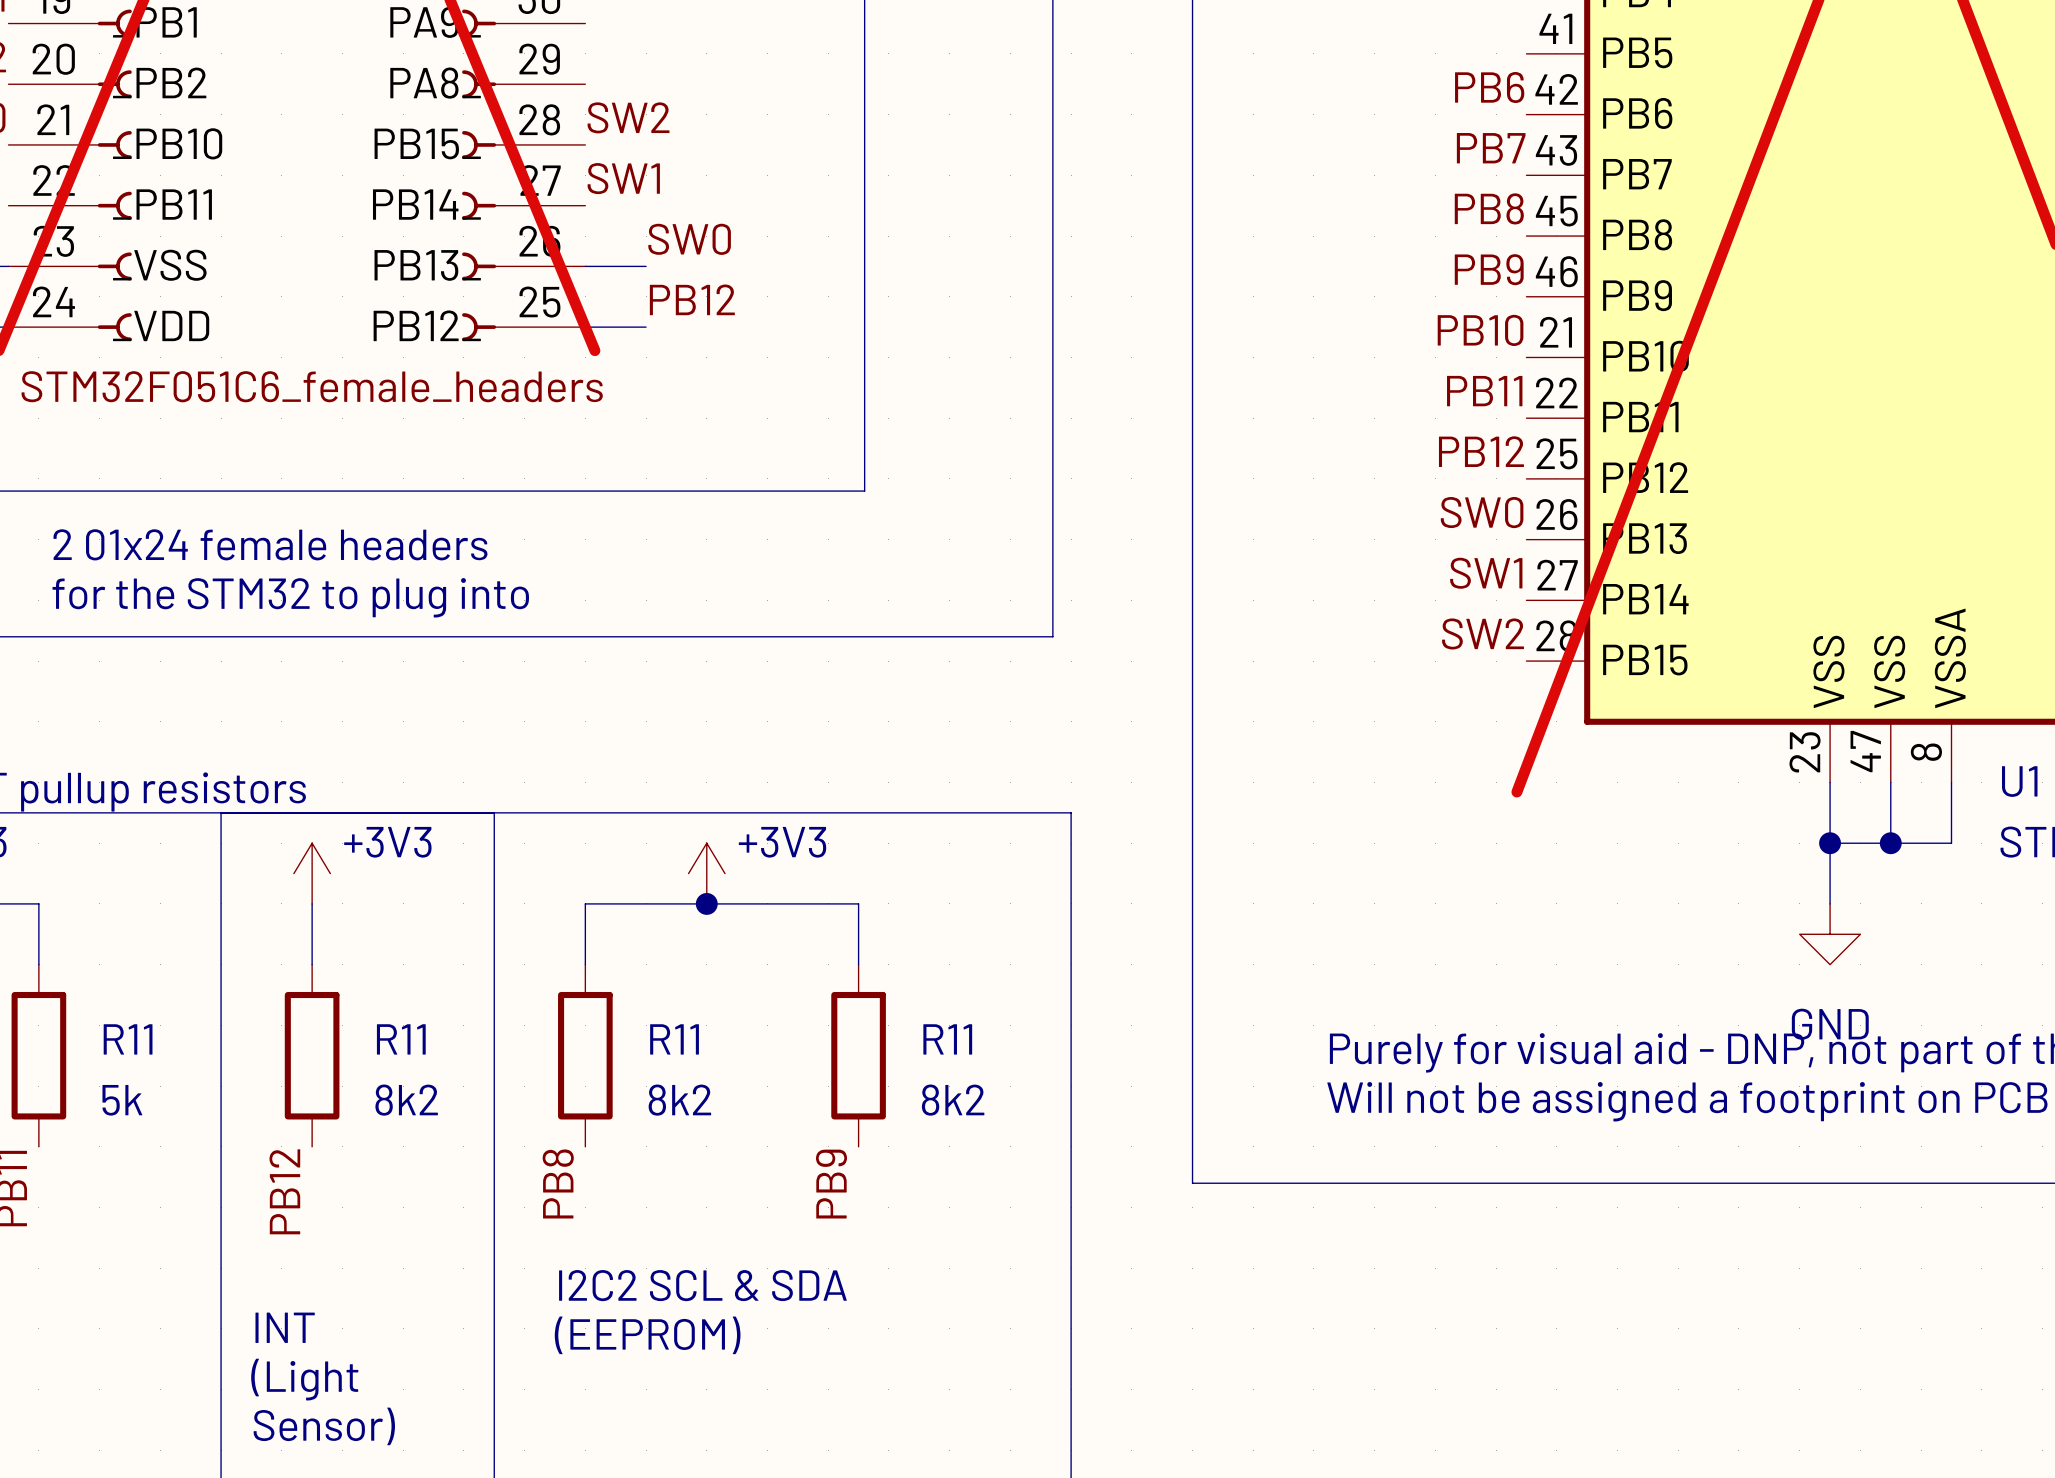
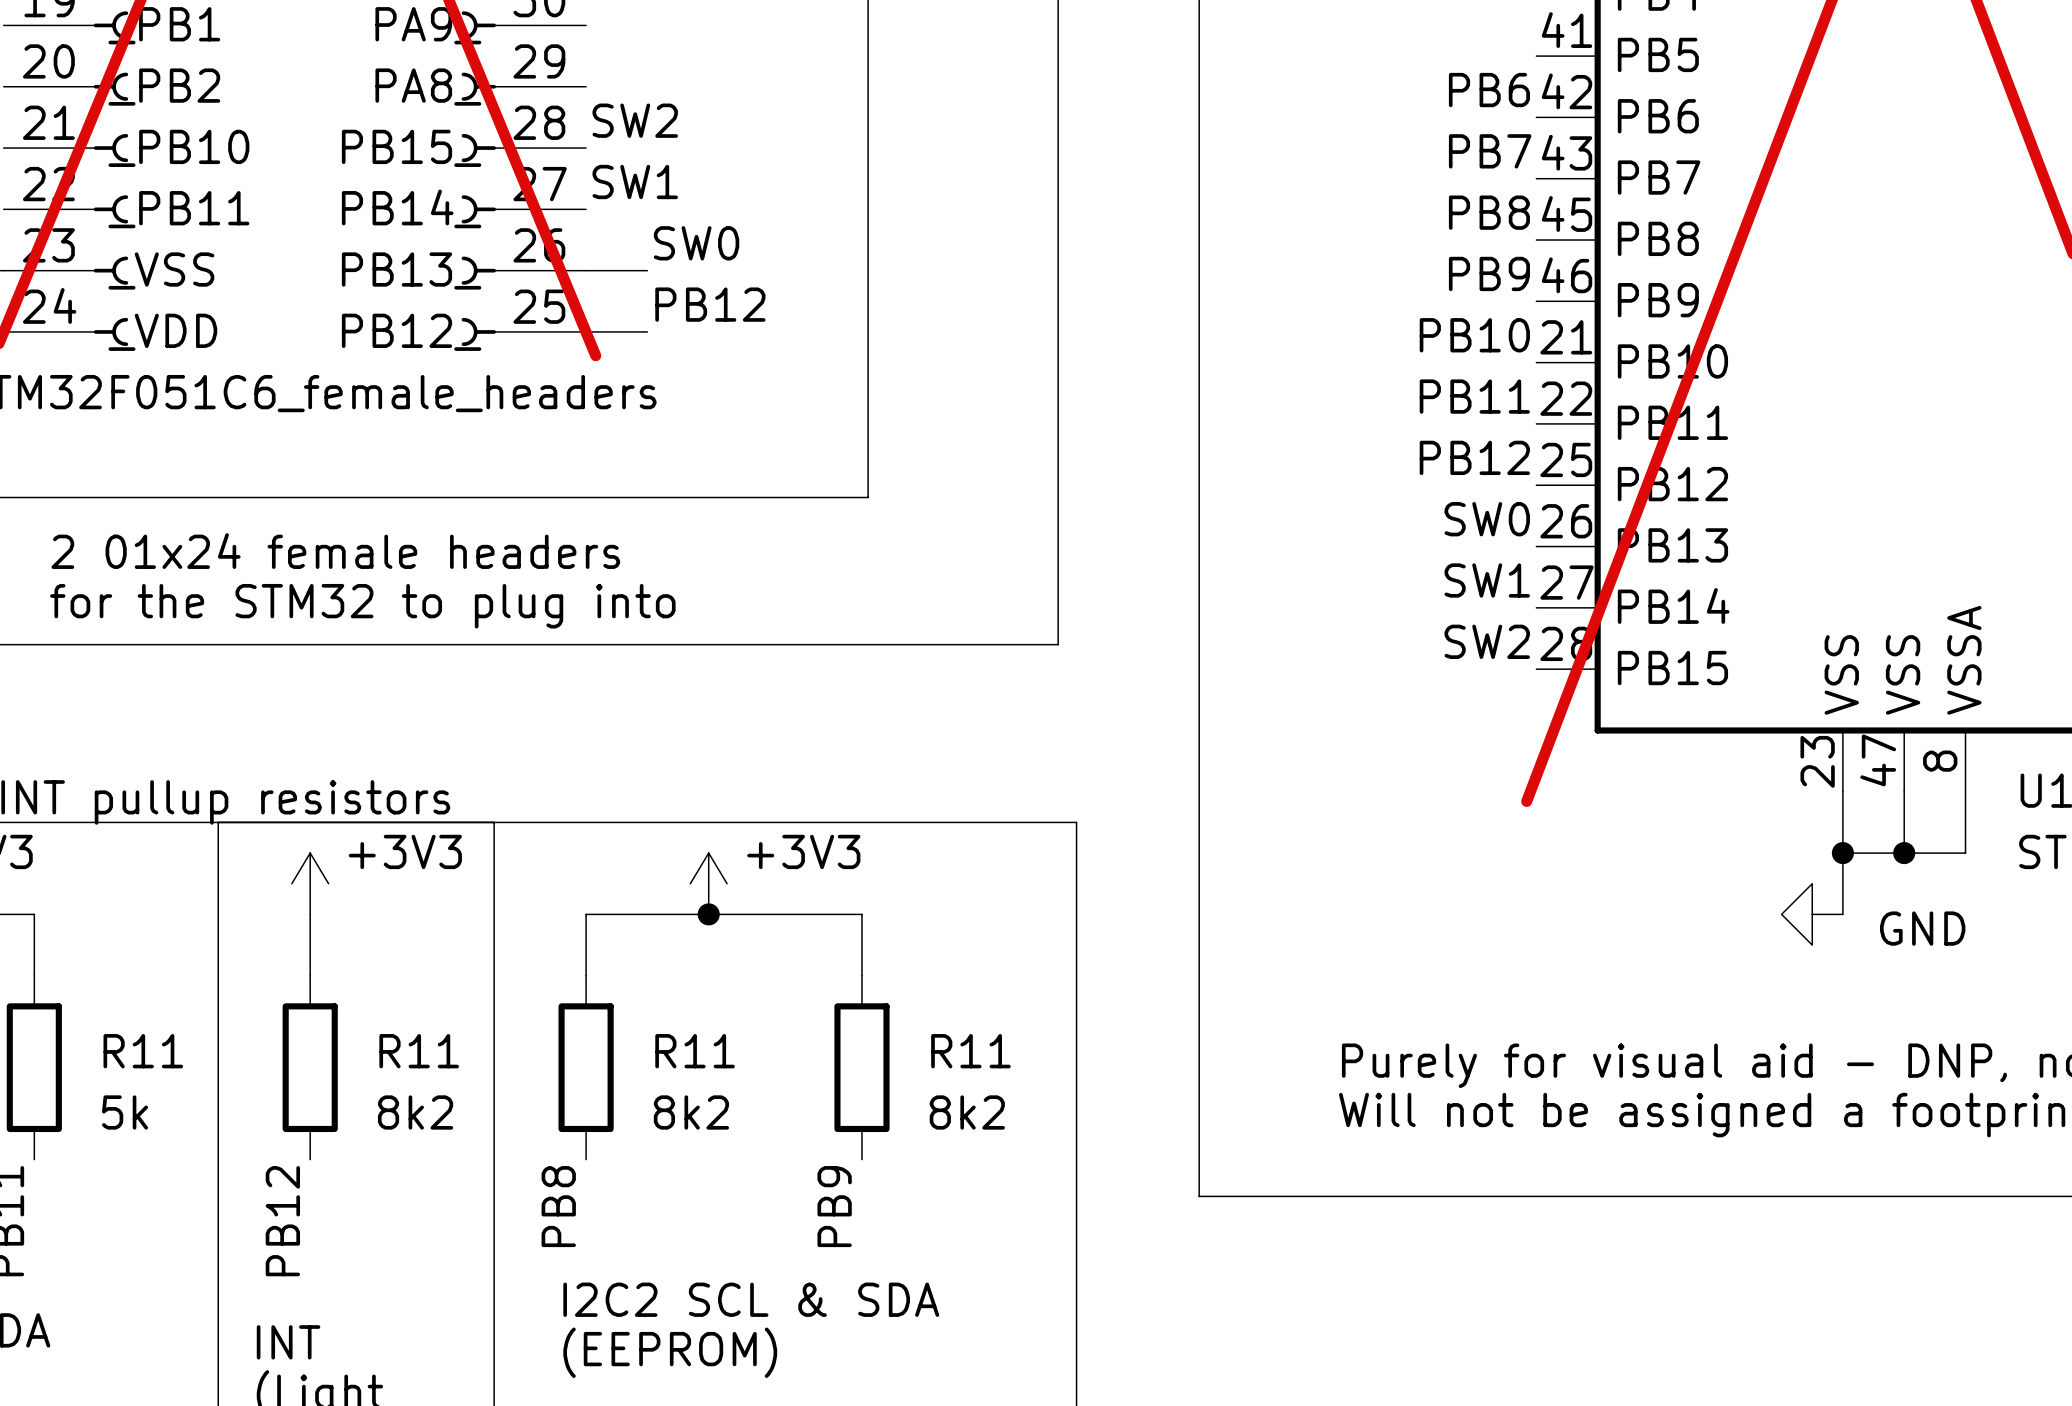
power symbol rotation: 0° (1830, 934) -> 90° clockwise (1812, 914)
power symbol position: GND (1830, 934) -> GND (1812, 914)
power symbol text position: GND (1830, 1024) -> GND (1922, 928)

